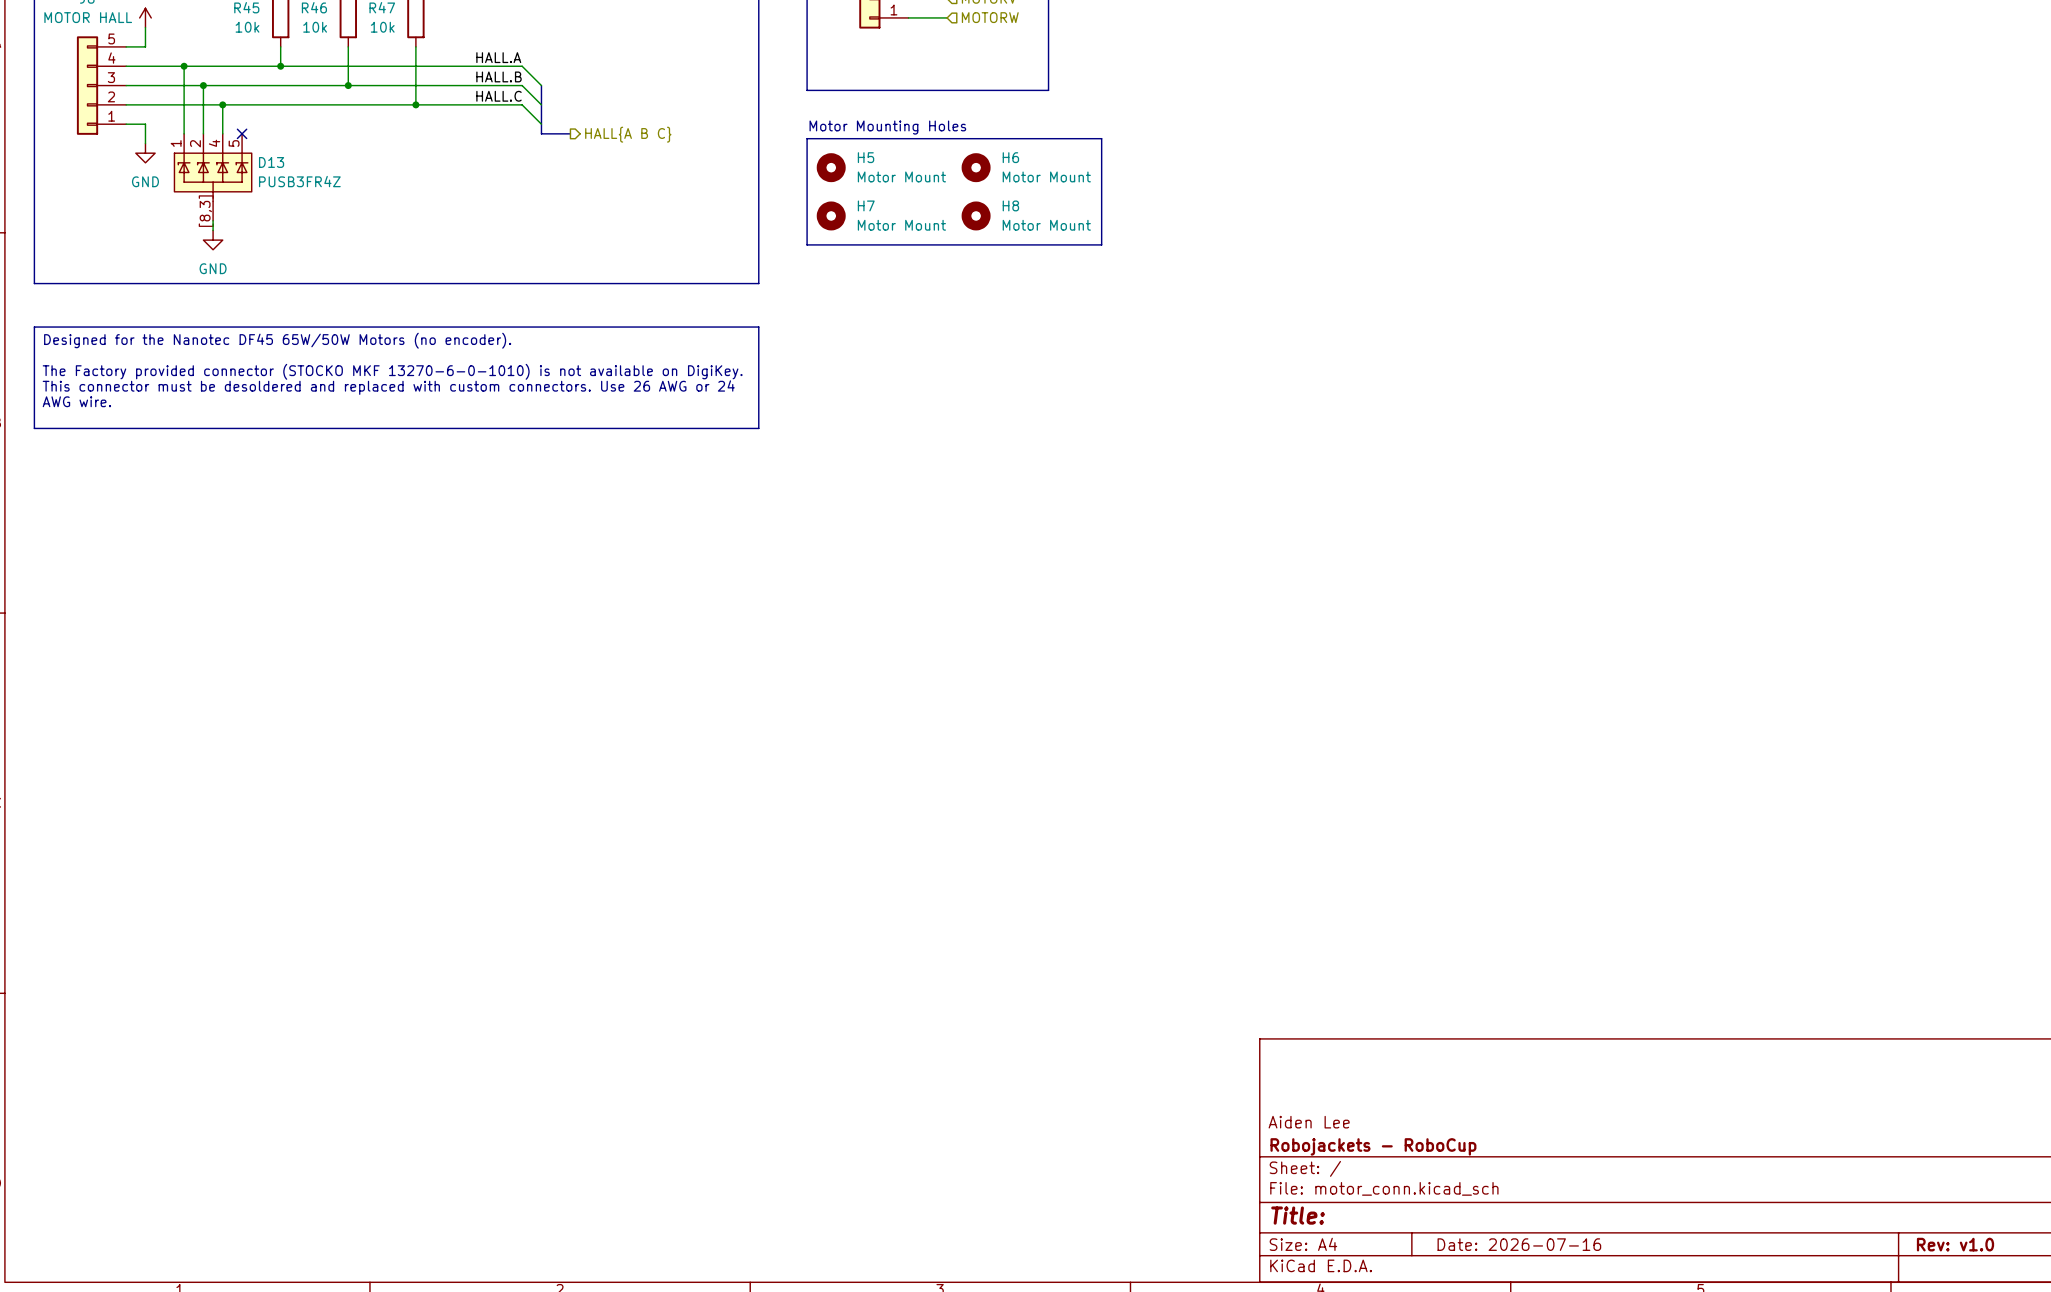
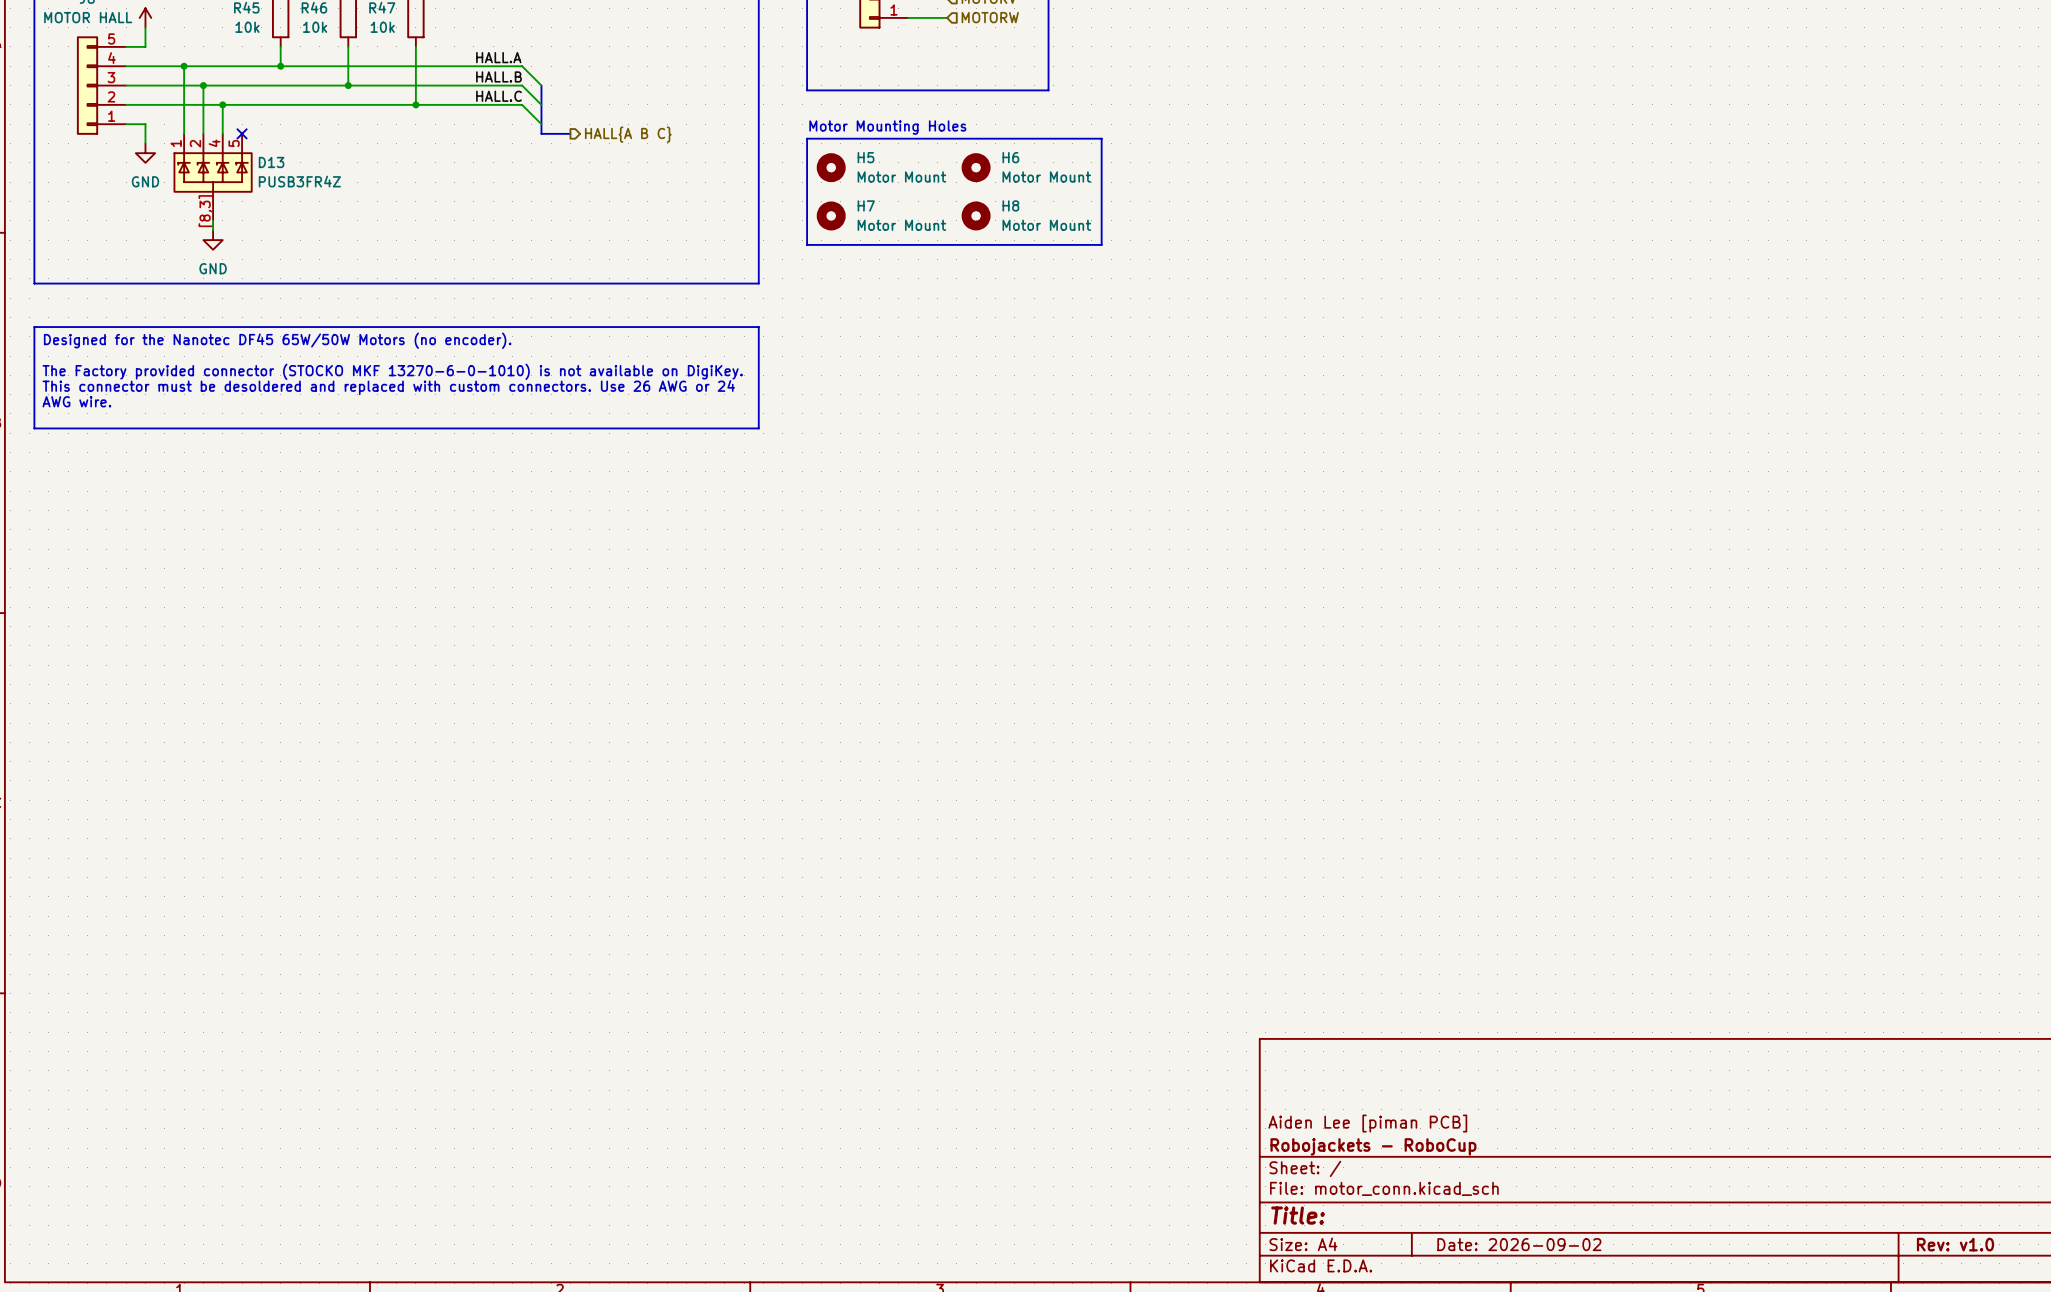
title block: Aiden Lee (1309, 1122) -> Aiden Lee [piman PCB] (1367, 1123)
title block: Date: 2026-07-16 (1519, 1244) -> Date: 2026-09-02 (1519, 1244)

